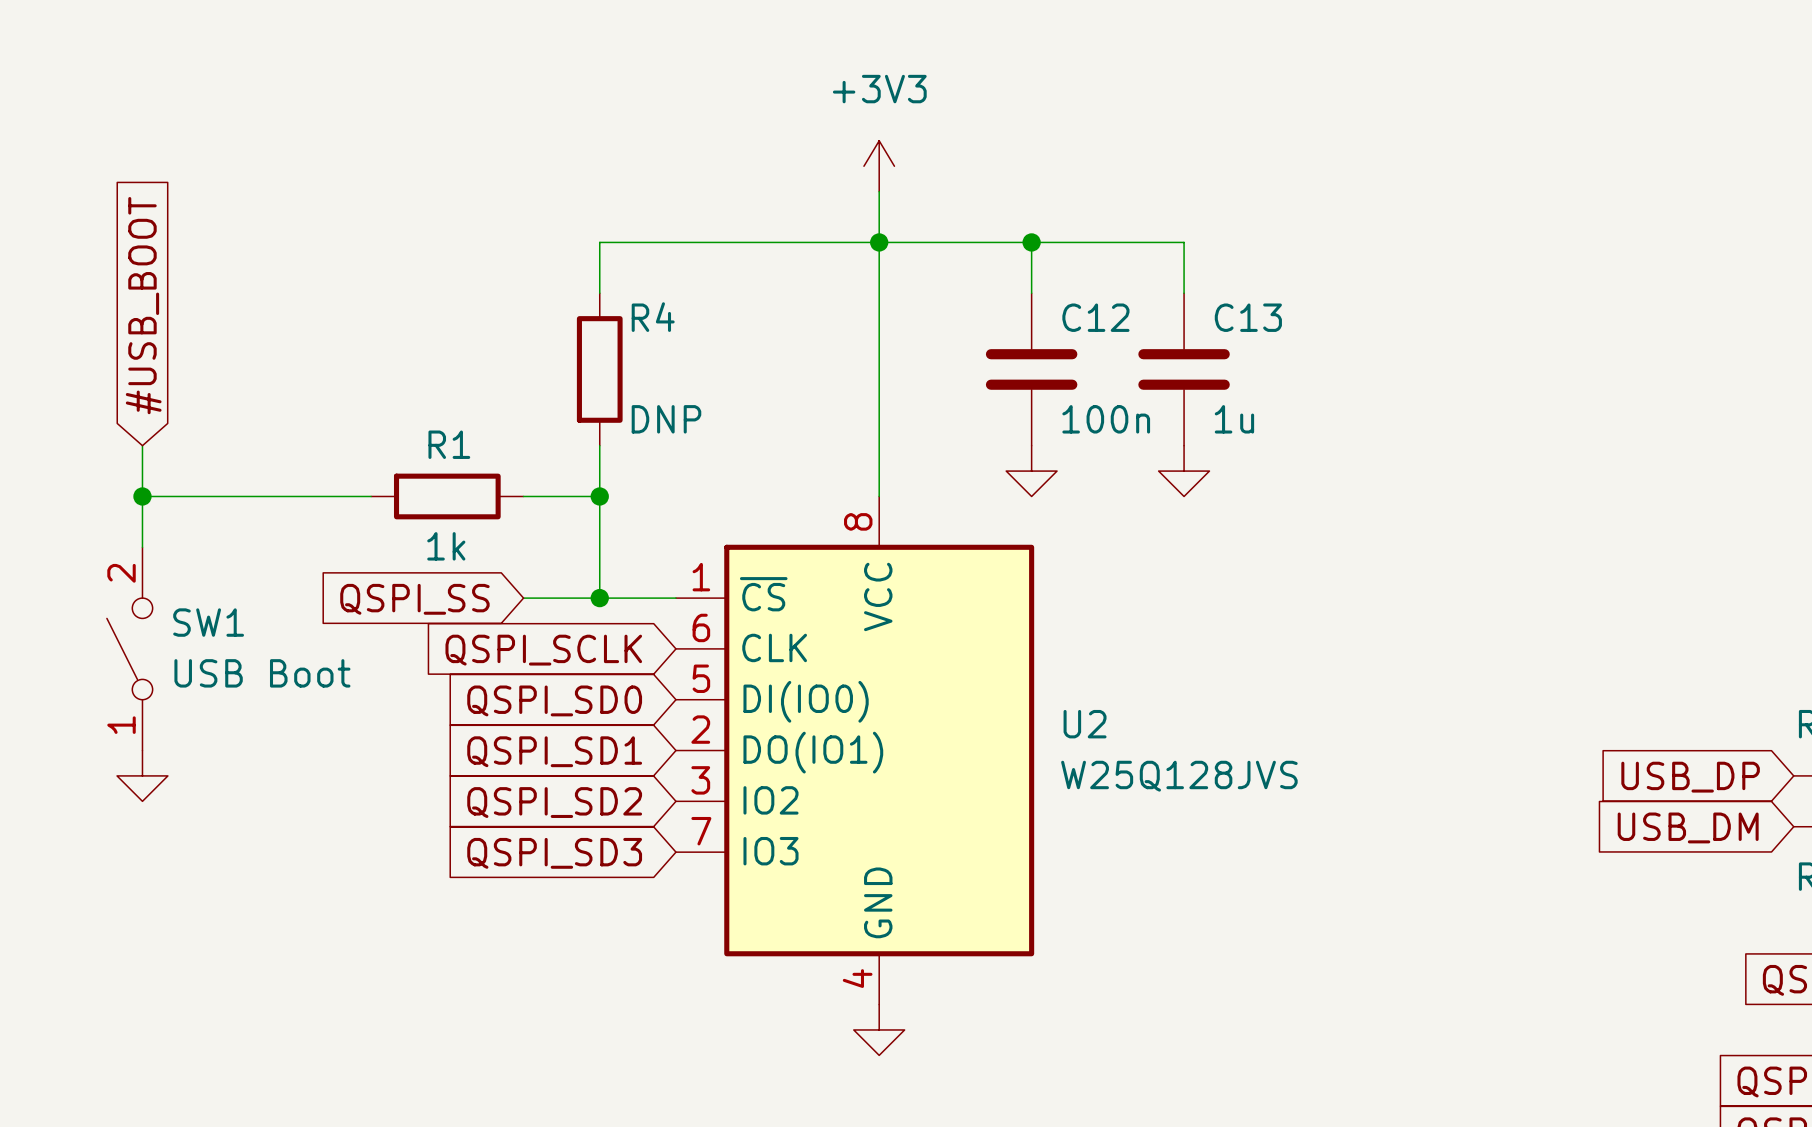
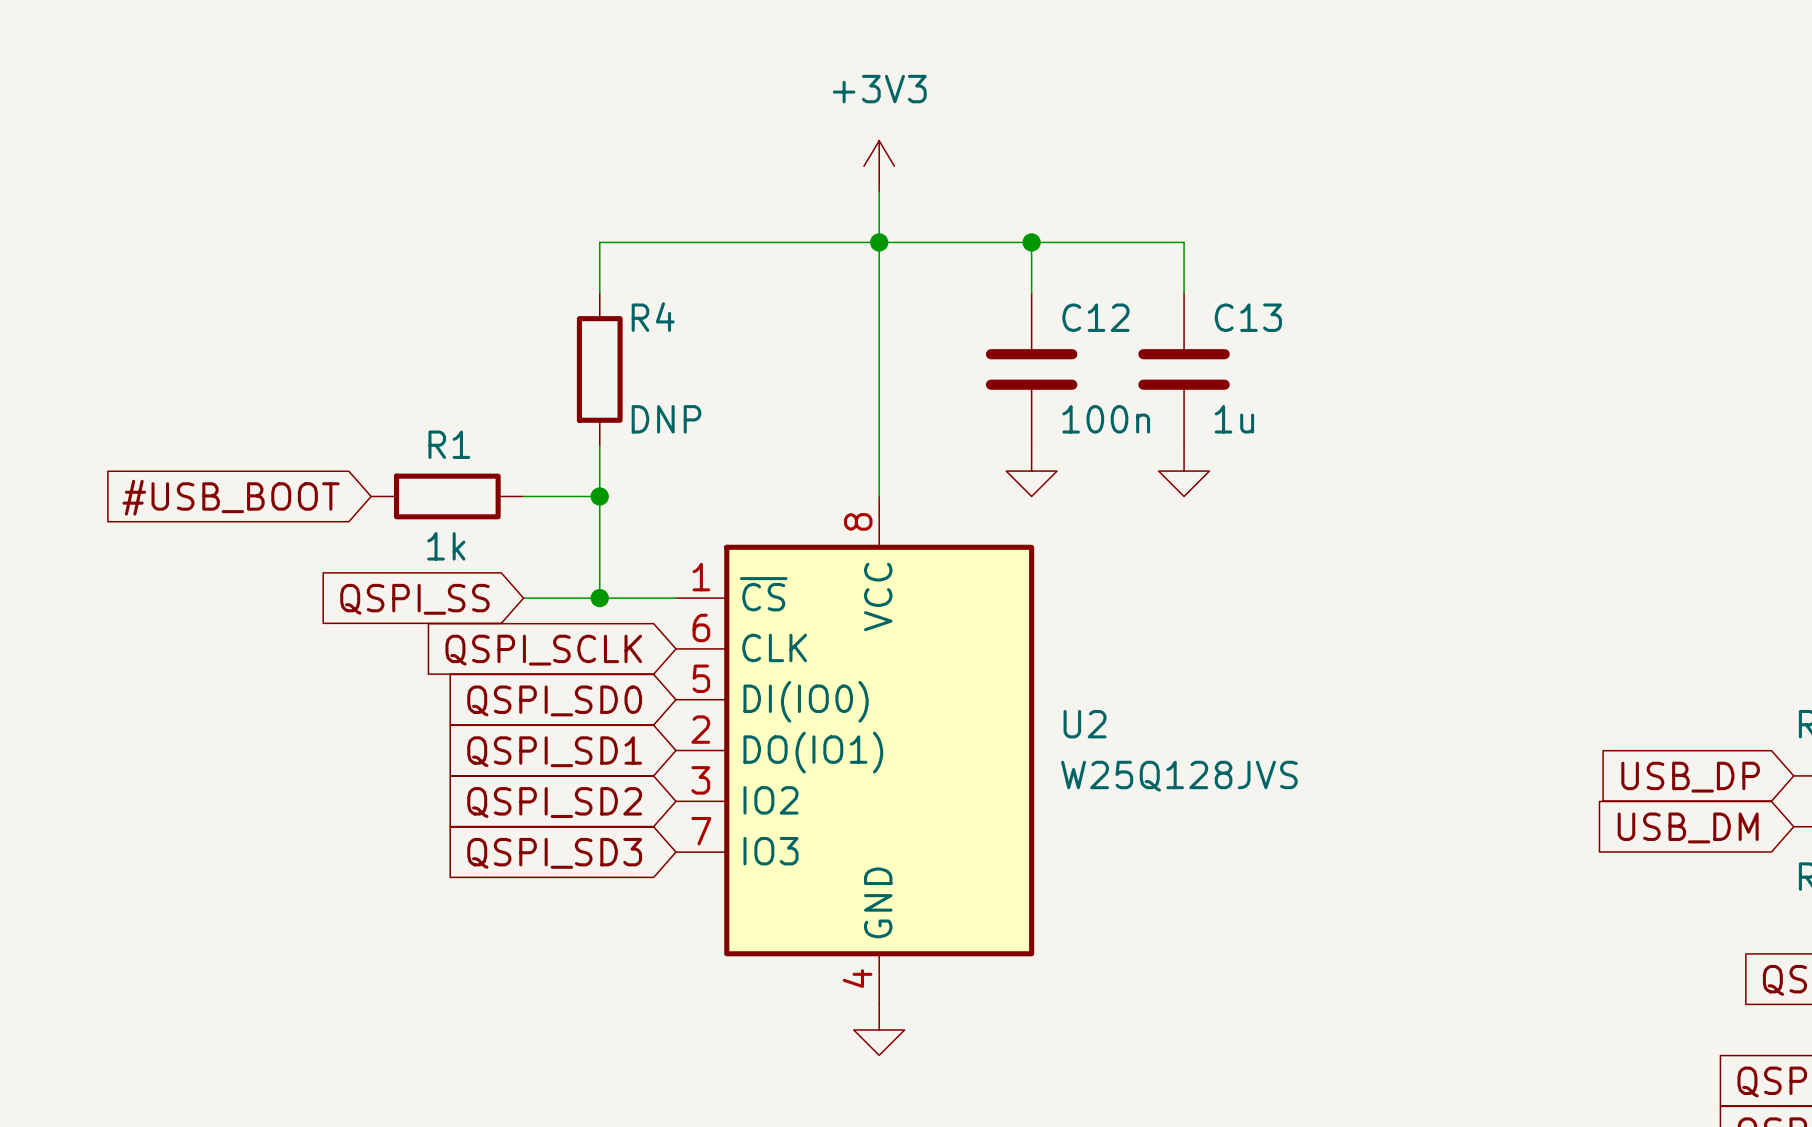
global label rotation: 0° (143, 305) -> 90° counterclockwise (231, 497)
wire: (142, 445) (142, 547) -> none
wire: (142, 496) (371, 496) -> none
junction: (142, 496) -> none
SW1: USB Boot (129, 648) -> none
power symbol: (142, 775) -> none

